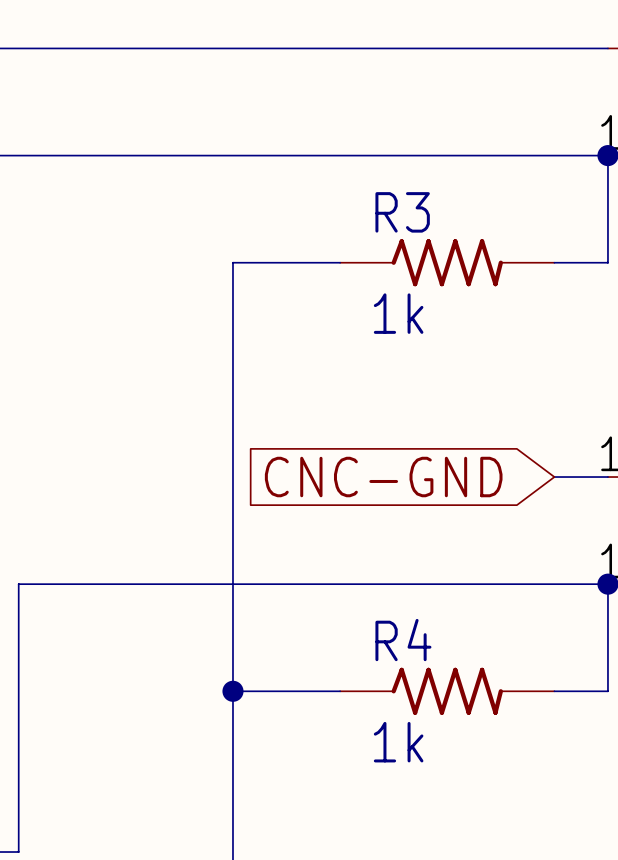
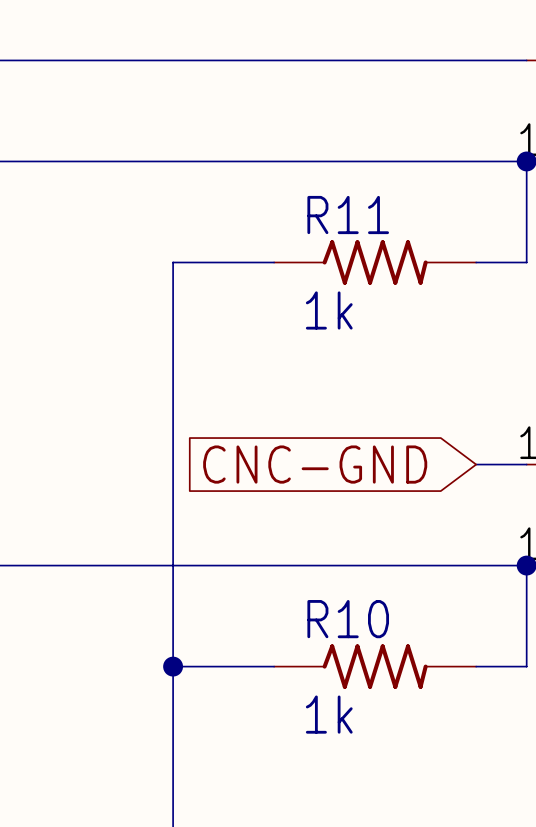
R3 name: R3 (402, 212) -> R11 (348, 215)
R4 name: R4 (403, 640) -> R10 (348, 619)

